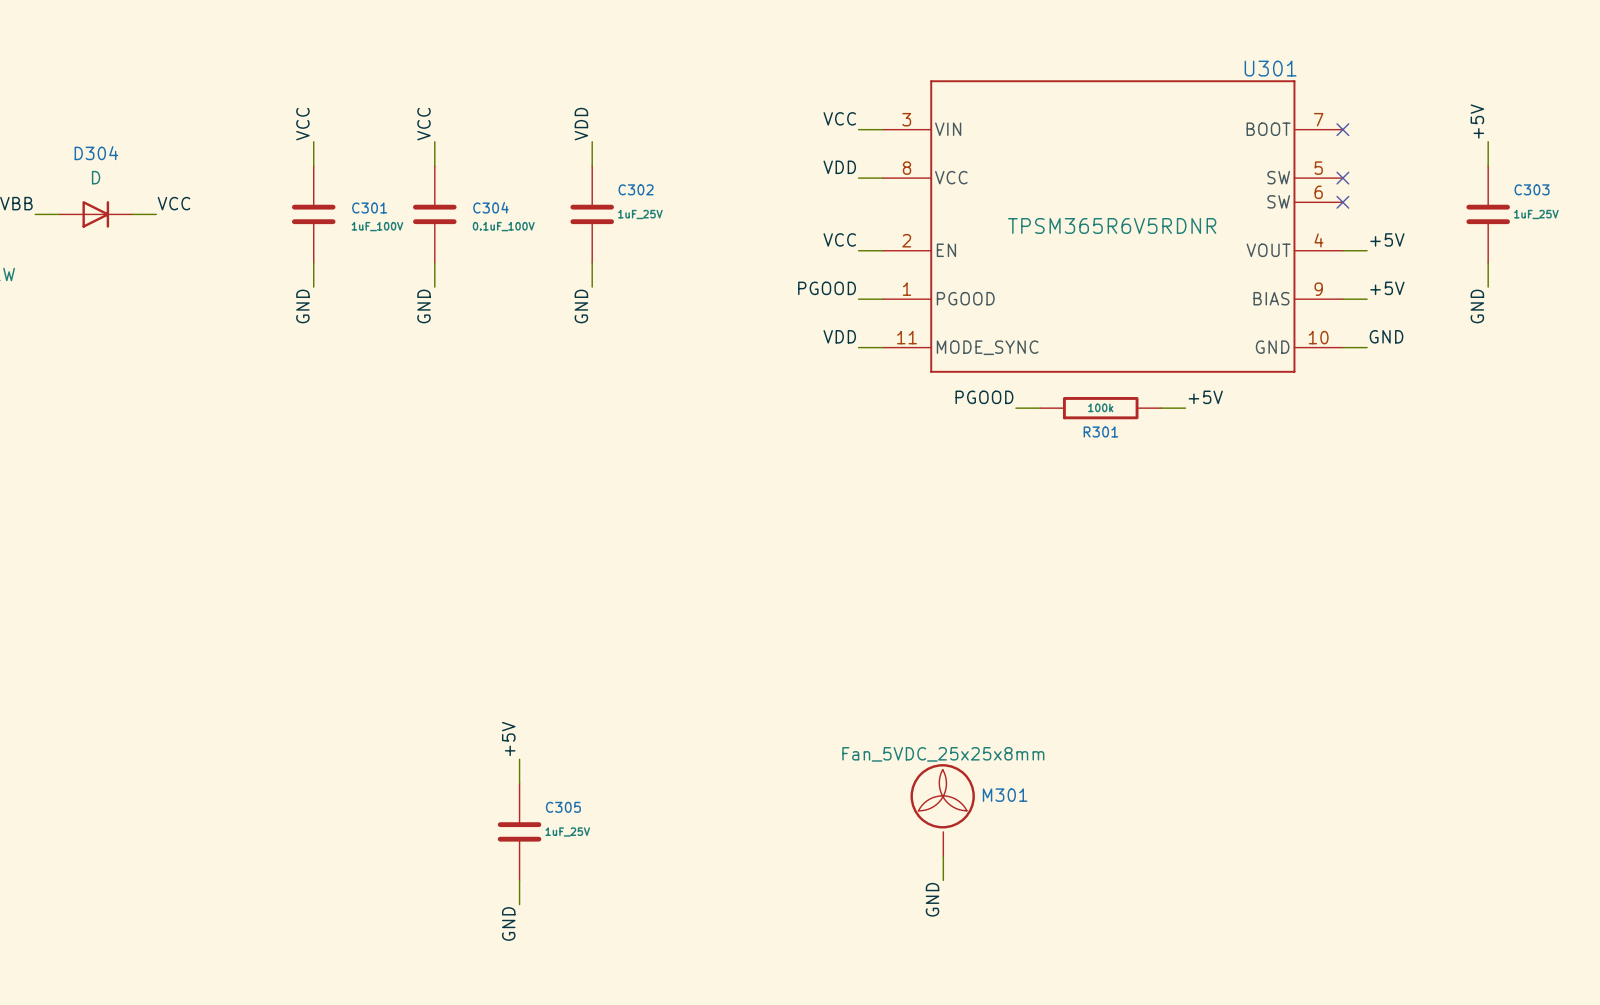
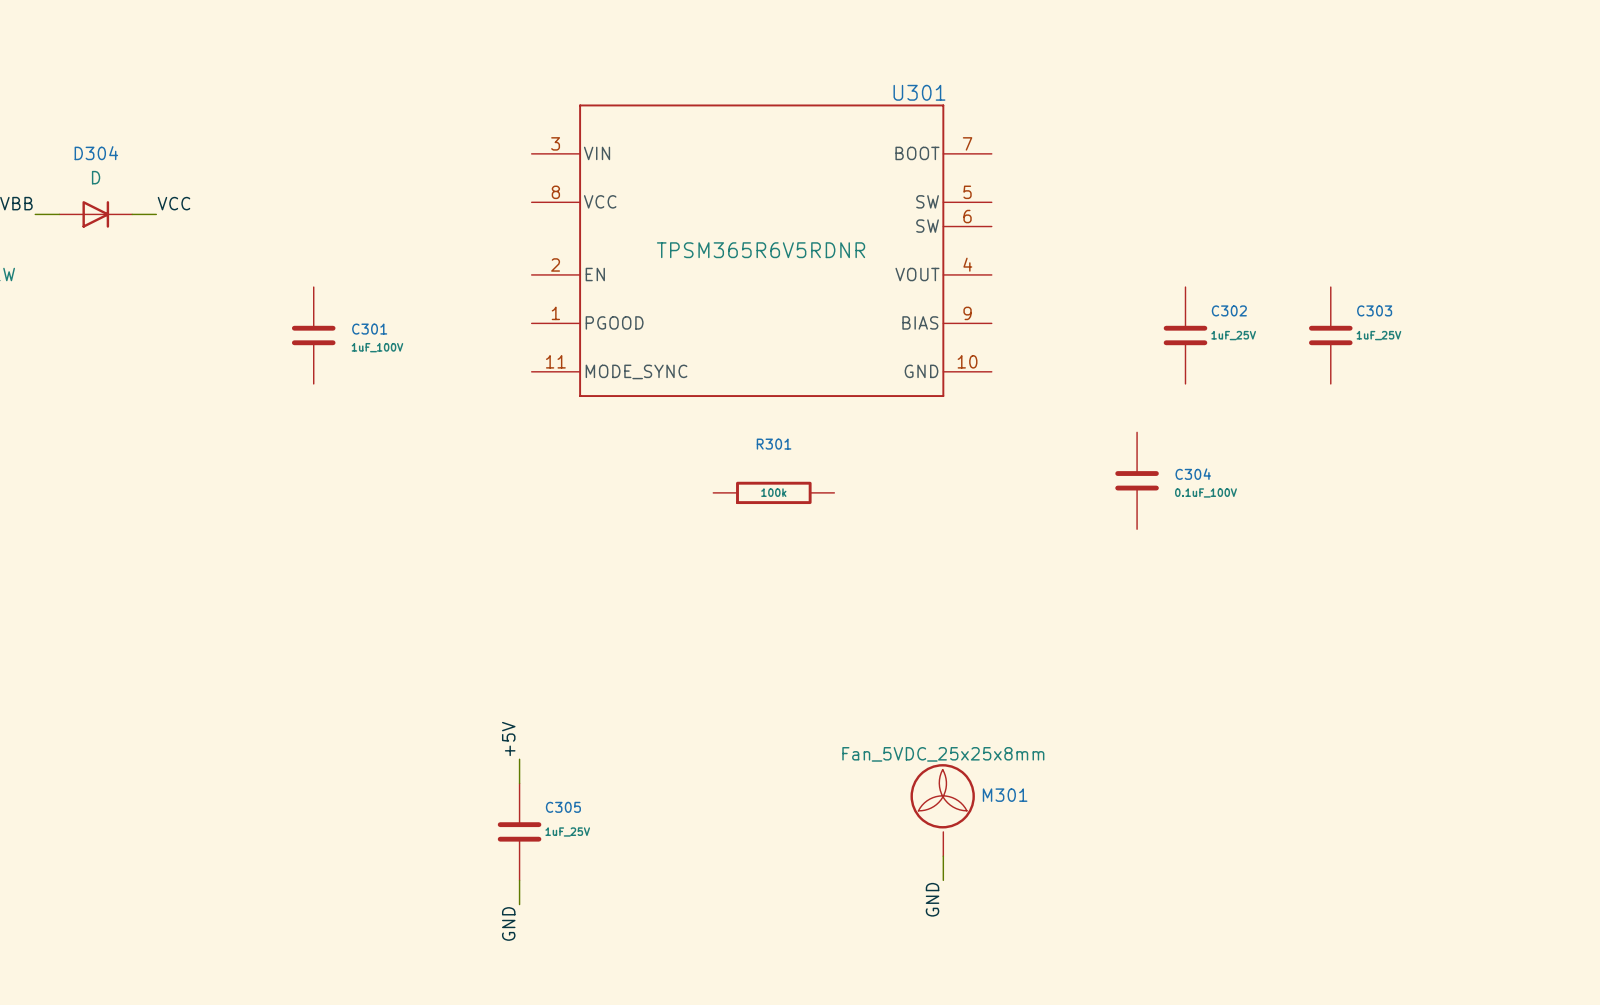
label: VCC (839, 118) -> none
label: +5V (1477, 121) -> none
label: VCC (302, 124) -> none
label: VCC (423, 124) -> none
label: VDD (581, 124) -> none
wire: (858, 129) (882, 129) -> none
no-connect mark: (1342, 129) -> none
wire: (313, 141) (313, 165) -> none
wire: (434, 141) (434, 165) -> none
wire: (592, 141) (592, 165) -> none
wire: (1488, 141) (1488, 165) -> none
label: VDD (839, 167) -> none
wire: (858, 178) (882, 178) -> none
no-connect mark: (1342, 178) -> none
no-connect mark: (1342, 202) -> none
C301 position: (313, 214) -> (313, 335)
C304 position: (434, 214) -> (1137, 480)
C302 position: (592, 214) -> (1185, 335)
C303 position: (1488, 214) -> (1330, 335)
U301 position: (1112, 226) -> (761, 250)
label: VCC (839, 239) -> none
label: +5V (1387, 239) -> none
wire: (858, 250) (882, 250) -> none
wire: (1342, 250) (1367, 250) -> none
wire: (313, 262) (313, 287) -> none
wire: (434, 262) (434, 287) -> none
wire: (592, 262) (592, 287) -> none
wire: (1488, 262) (1488, 287) -> none
label: PGOOD (827, 288) -> none
label: +5V (1387, 288) -> none
wire: (858, 299) (882, 299) -> none
wire: (1342, 299) (1367, 299) -> none
label: GND (302, 306) -> none
label: GND (423, 306) -> none
label: GND (581, 306) -> none
label: GND (1477, 306) -> none
label: VDD (839, 336) -> none
label: GND (1386, 336) -> none
wire: (858, 347) (882, 347) -> none
wire: (1342, 347) (1367, 347) -> none
label: PGOOD (984, 397) -> none
label: +5V (1205, 397) -> none
wire: (1015, 408) (1040, 408) -> none
R301 position: (1100, 408) -> (773, 492)
wire: (1161, 408) (1185, 408) -> none
R301 name position: R301 (1100, 432) -> R301 (774, 444)

